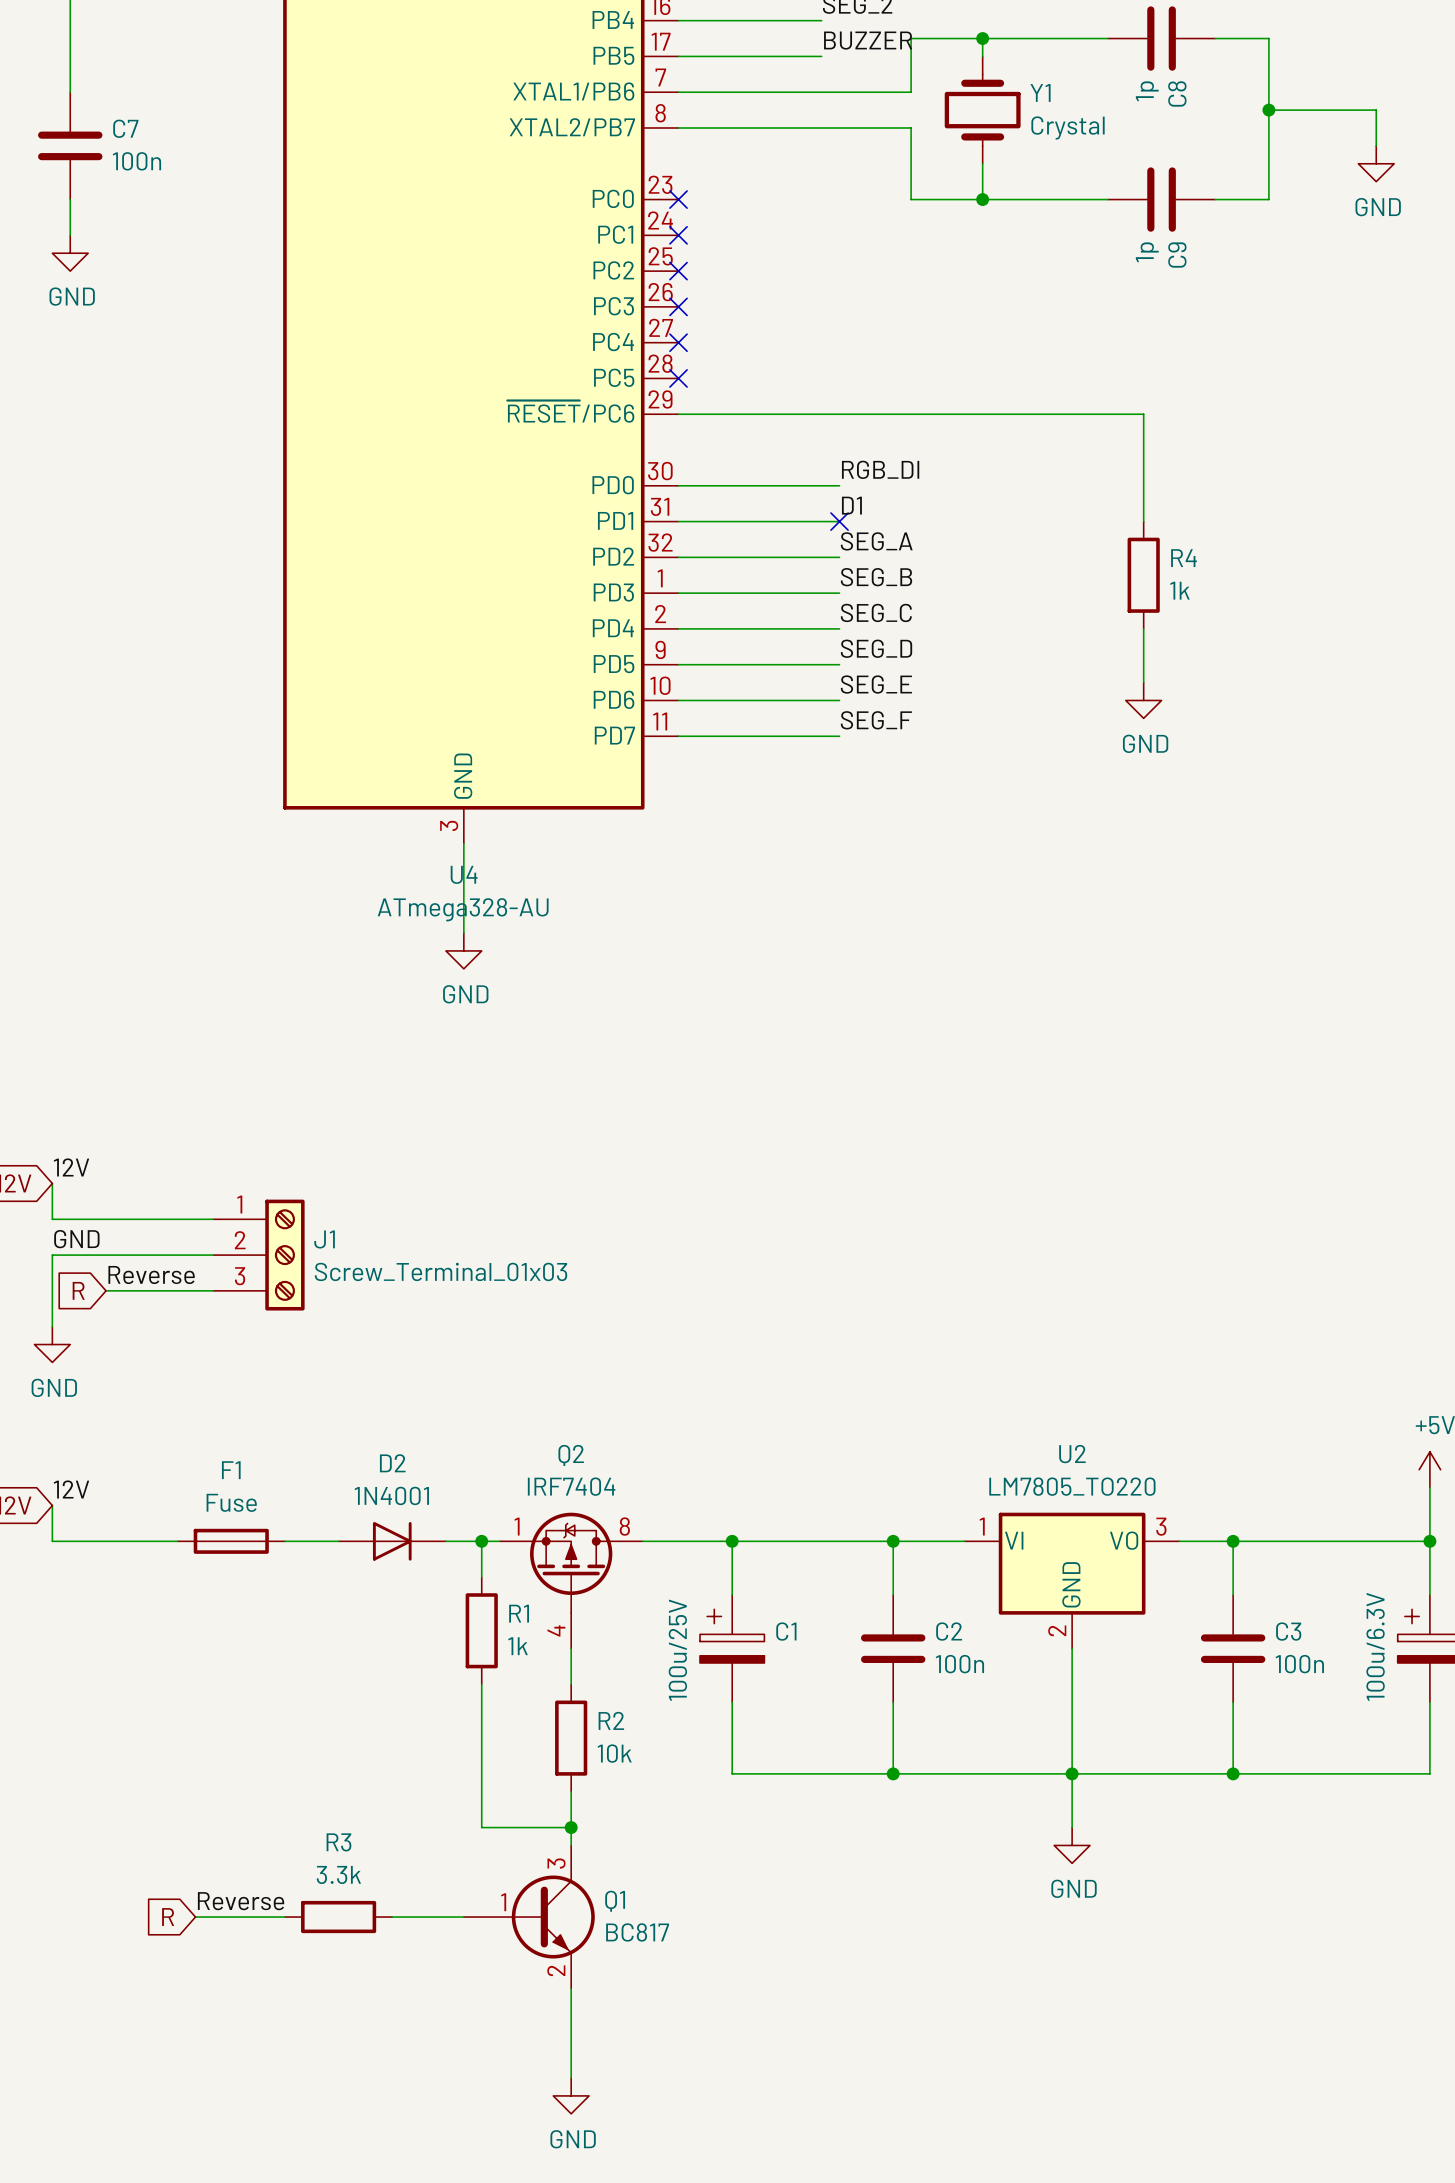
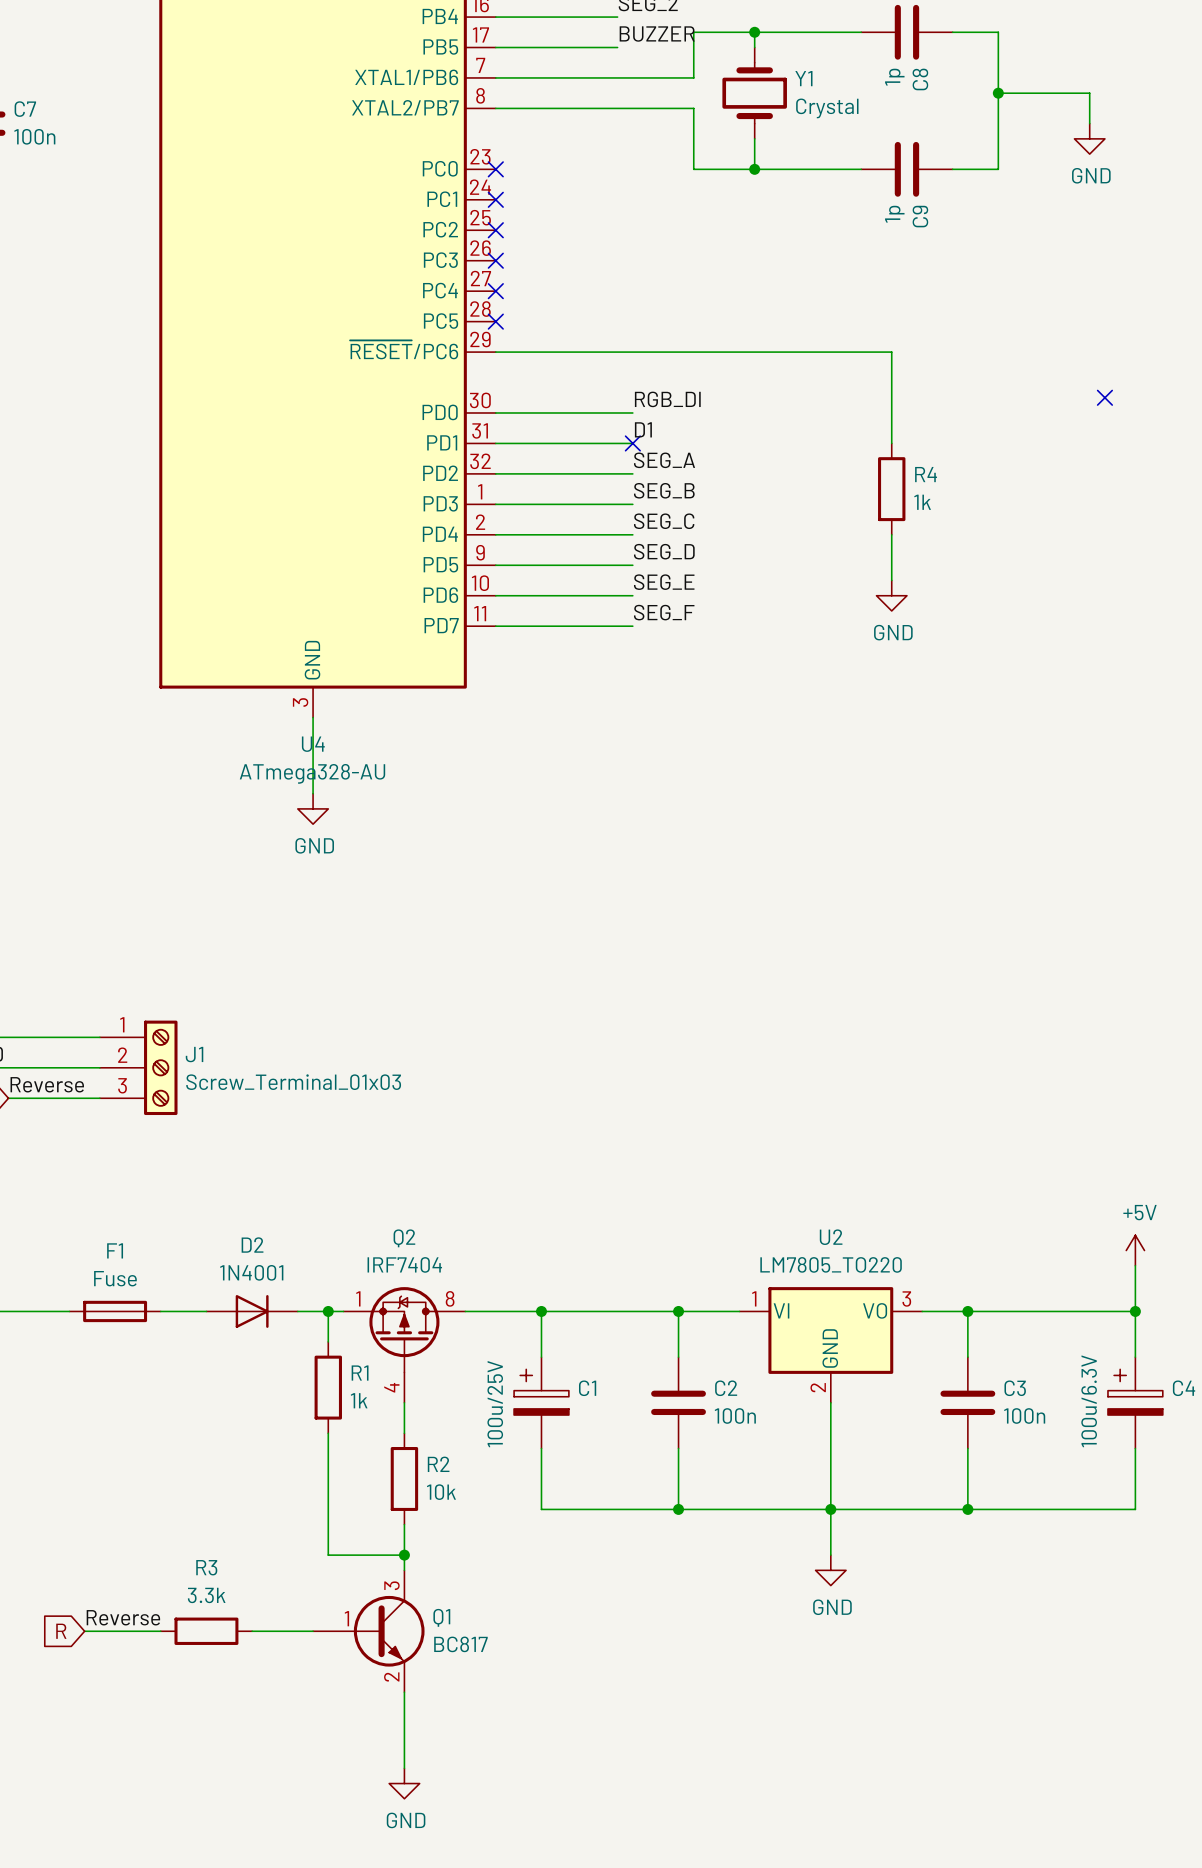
no-connect mark: none -> (1104, 397)

